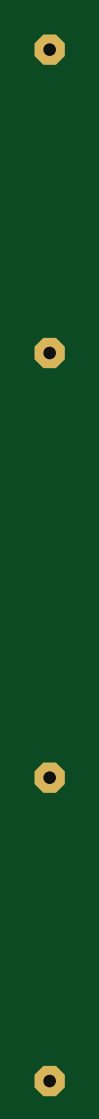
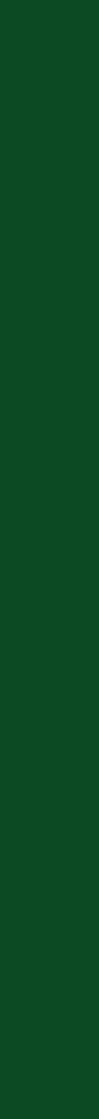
part: (49, 49) -> none
part: (49, 353) -> none
part: (49, 777) -> none
part: (49, 1081) -> none

